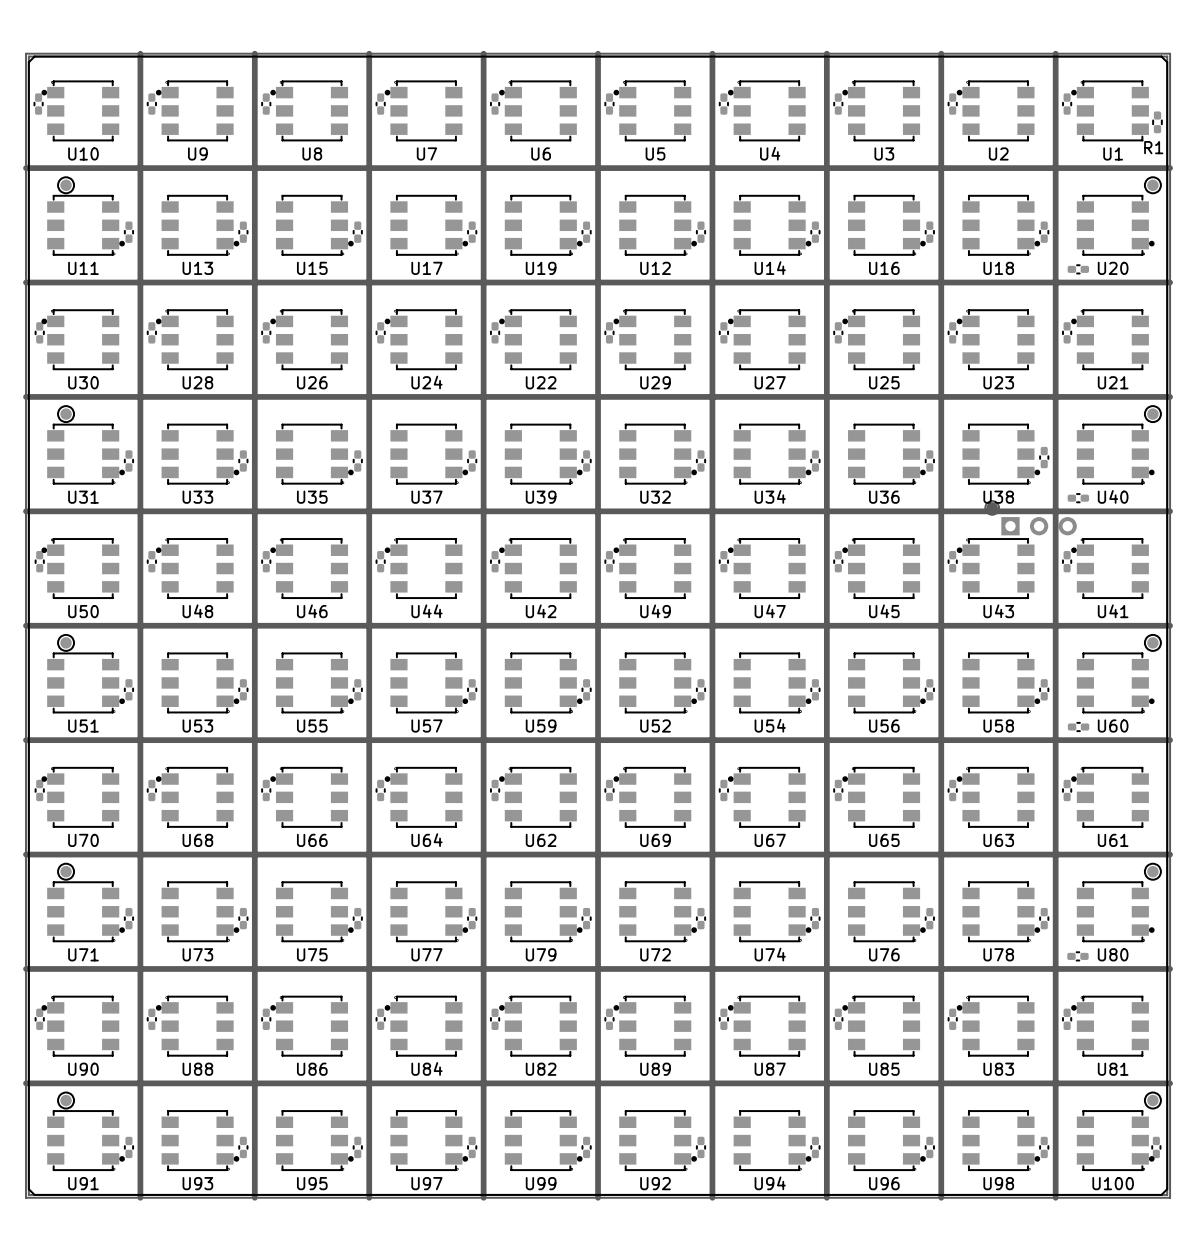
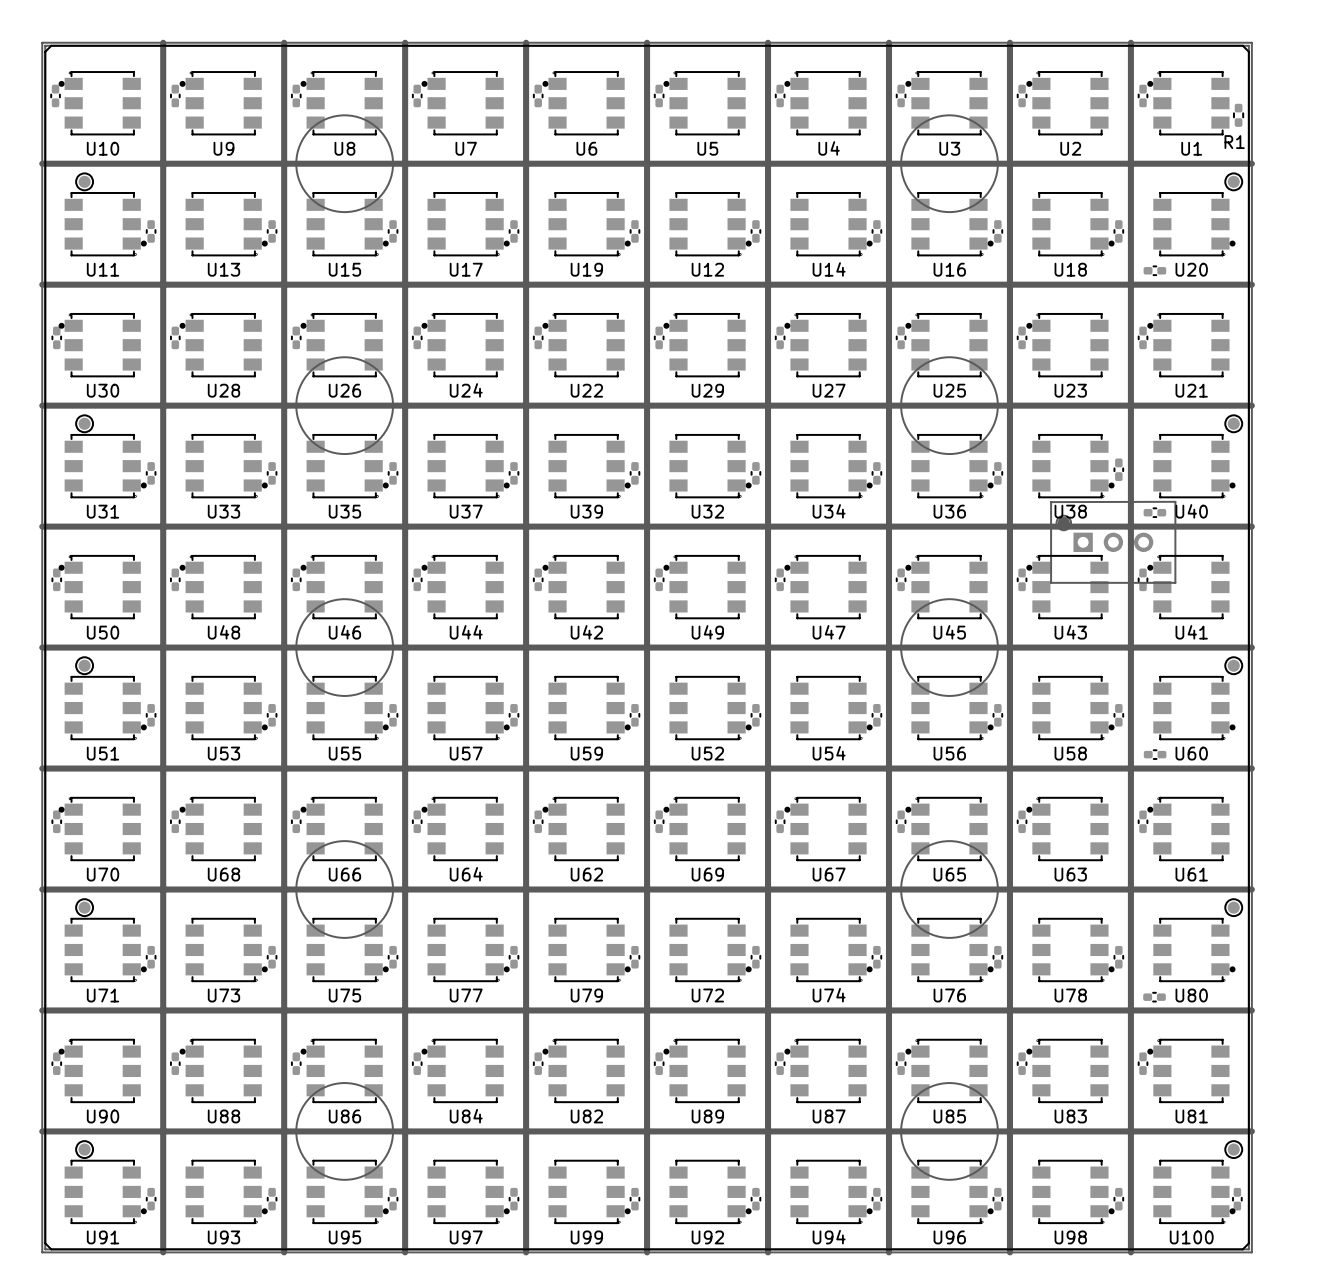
drawing: none -> [295, 114, 394, 213]
drawing: none -> [900, 114, 999, 213]
drawing: none -> [295, 356, 394, 455]
drawing: none -> [900, 356, 999, 455]
line: none -> (1175, 501) (1051, 502) (1051, 582) (1175, 582) (1175, 501)
drawing: none -> [295, 598, 394, 697]
drawing: none -> [900, 598, 999, 697]
drawing: none -> [295, 840, 394, 939]
drawing: none -> [900, 840, 999, 939]
drawing: none -> [295, 1082, 394, 1181]
drawing: none -> [900, 1082, 999, 1181]

